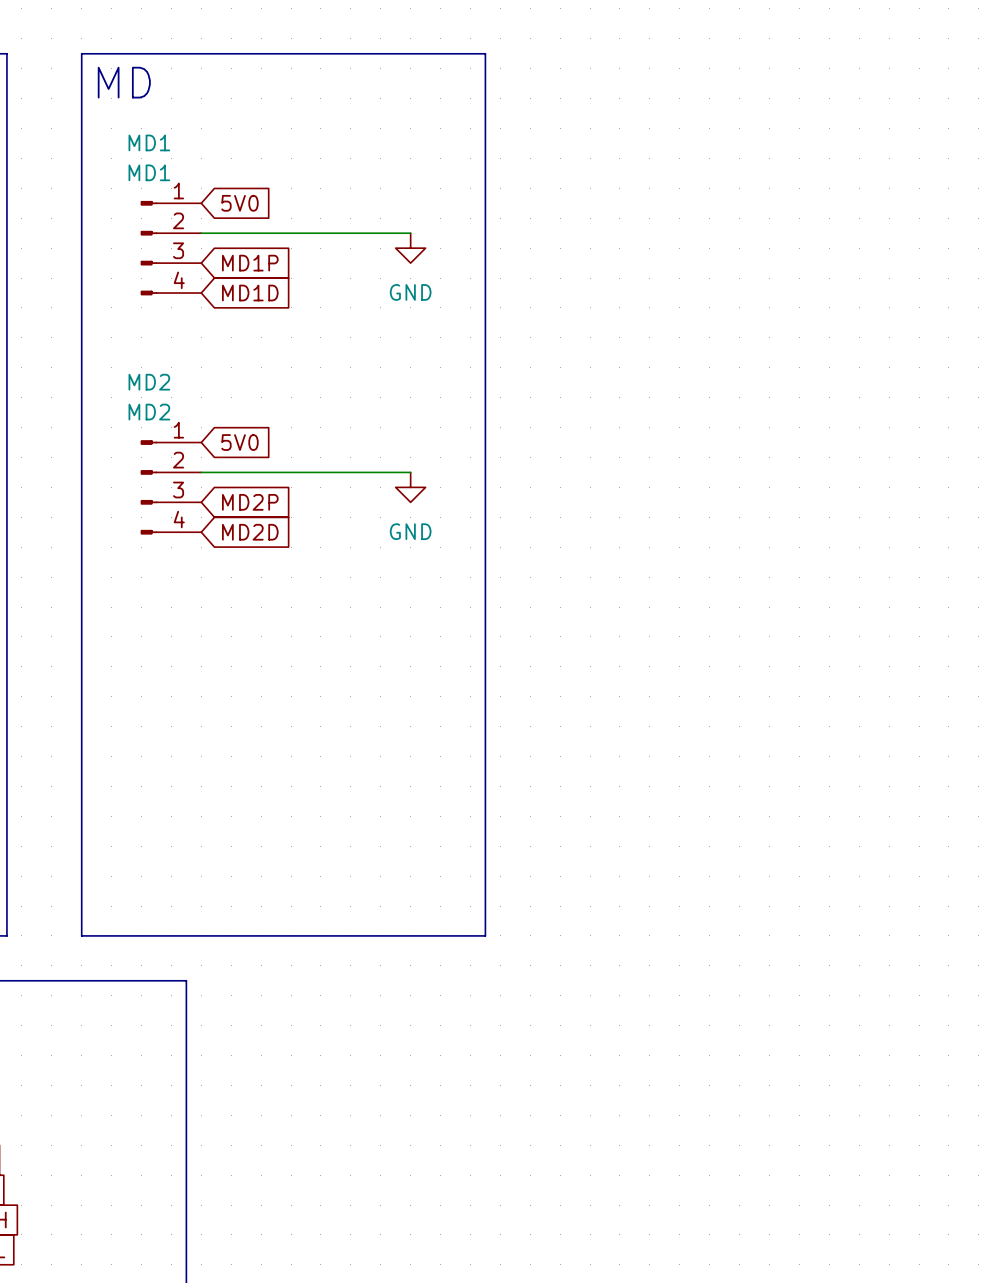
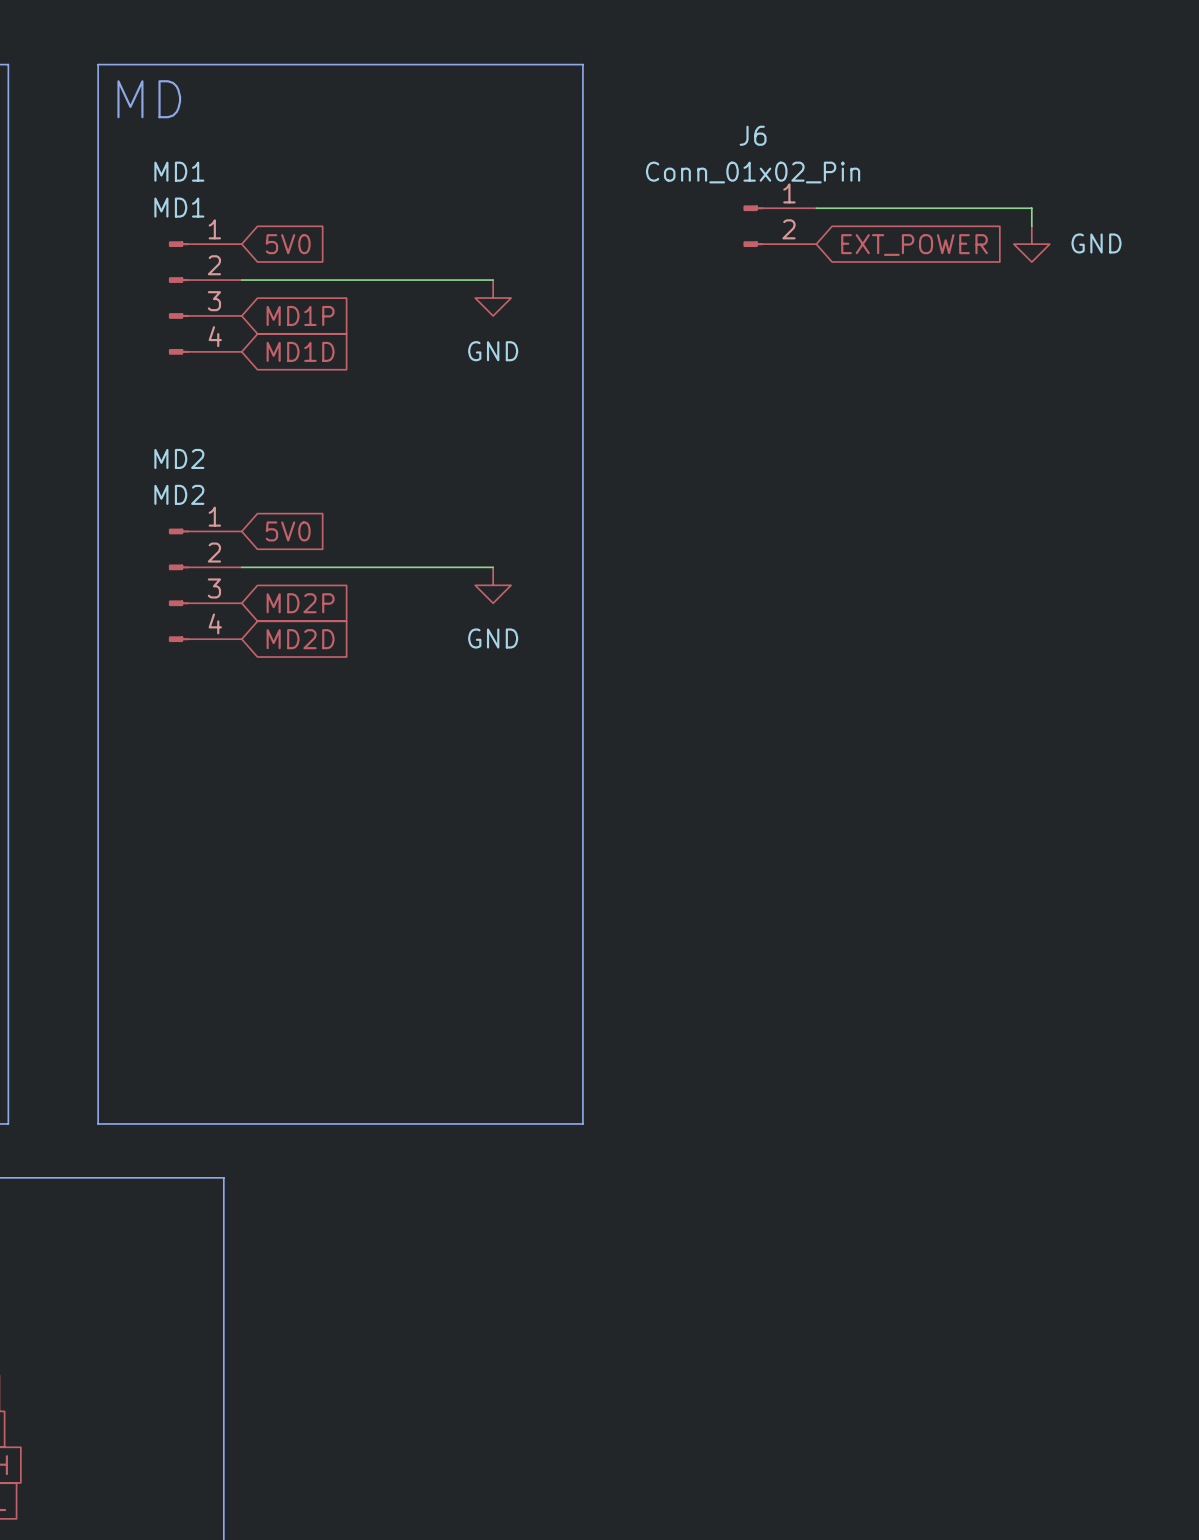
wire: none -> (816, 208) (1031, 208) (1031, 226)
J6: none -> Conn_01x02_Pin (779, 226)
power symbol: none -> GND (1031, 244)
global label: none -> EXT_POWER (914, 245)

